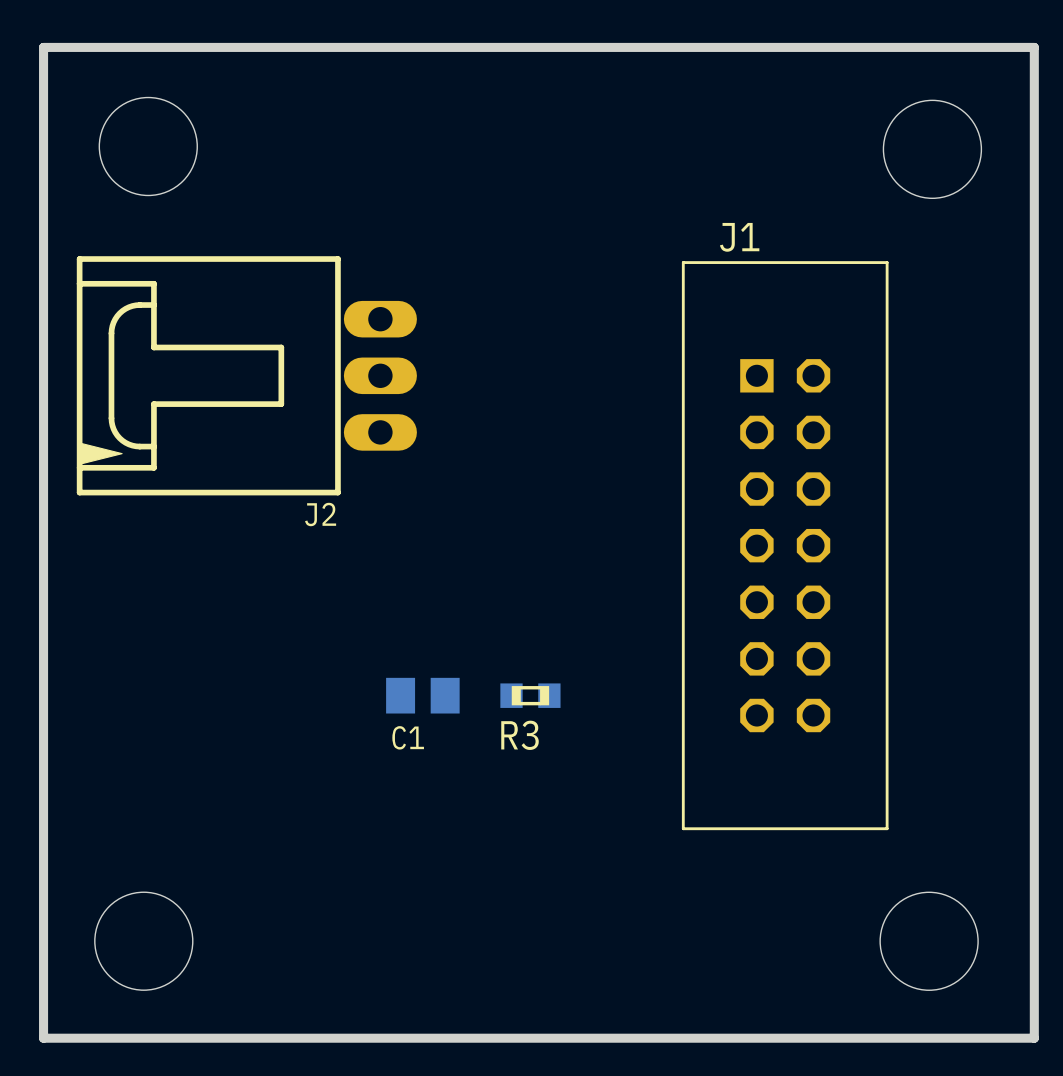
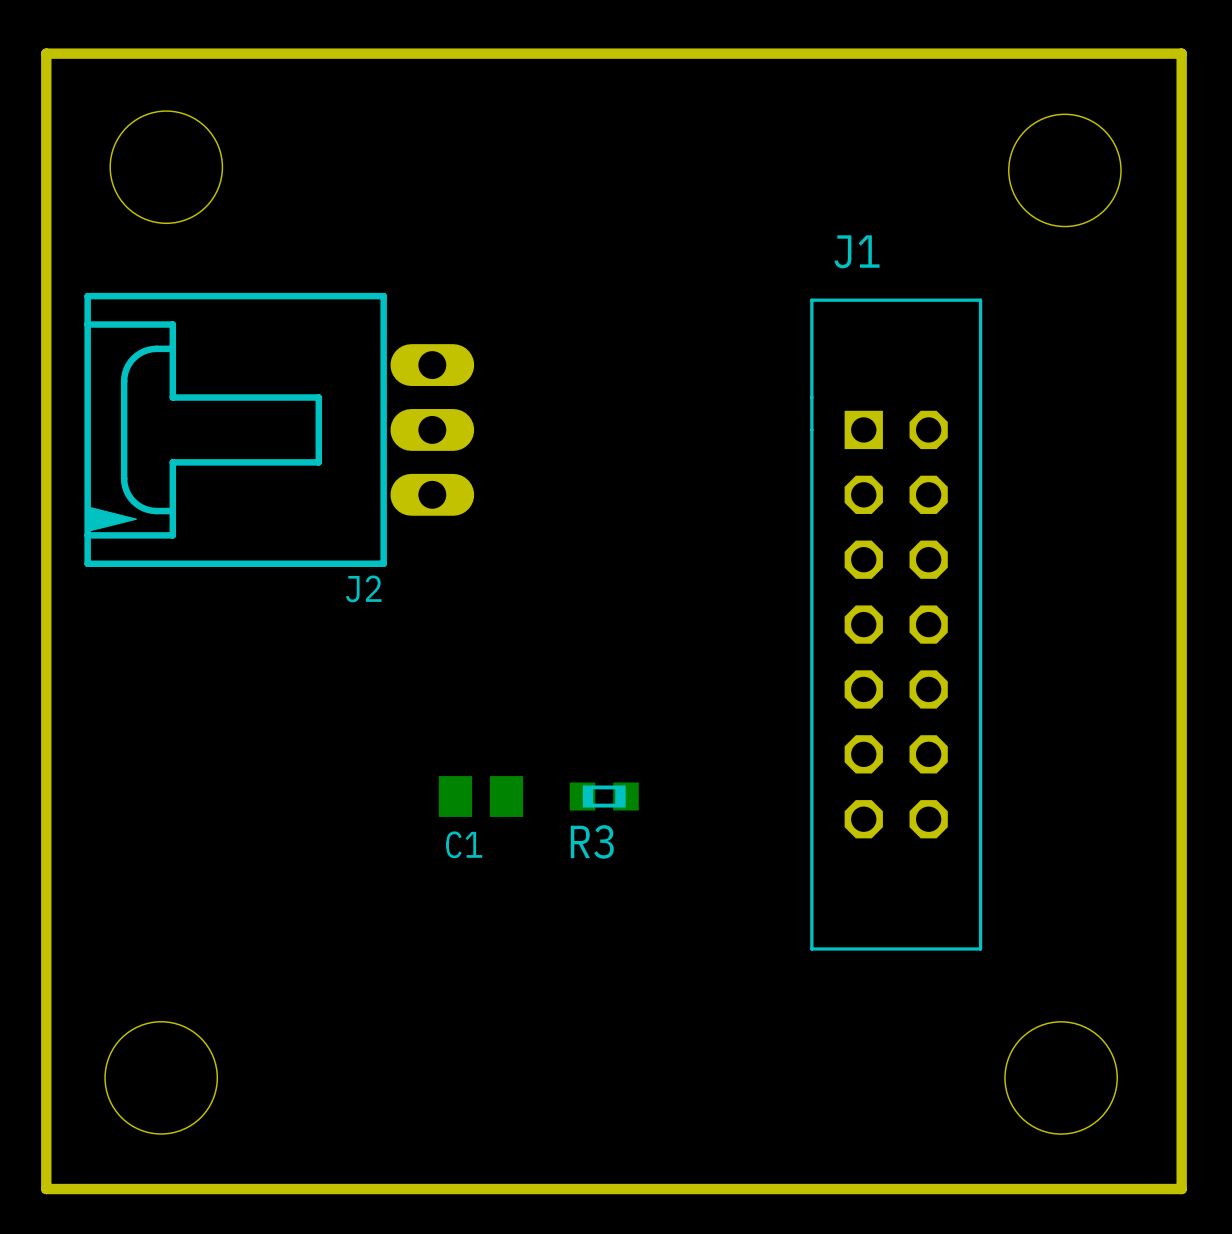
J1 footprint: [681, 261, 889, 831] -> [810, 298, 983, 951]

